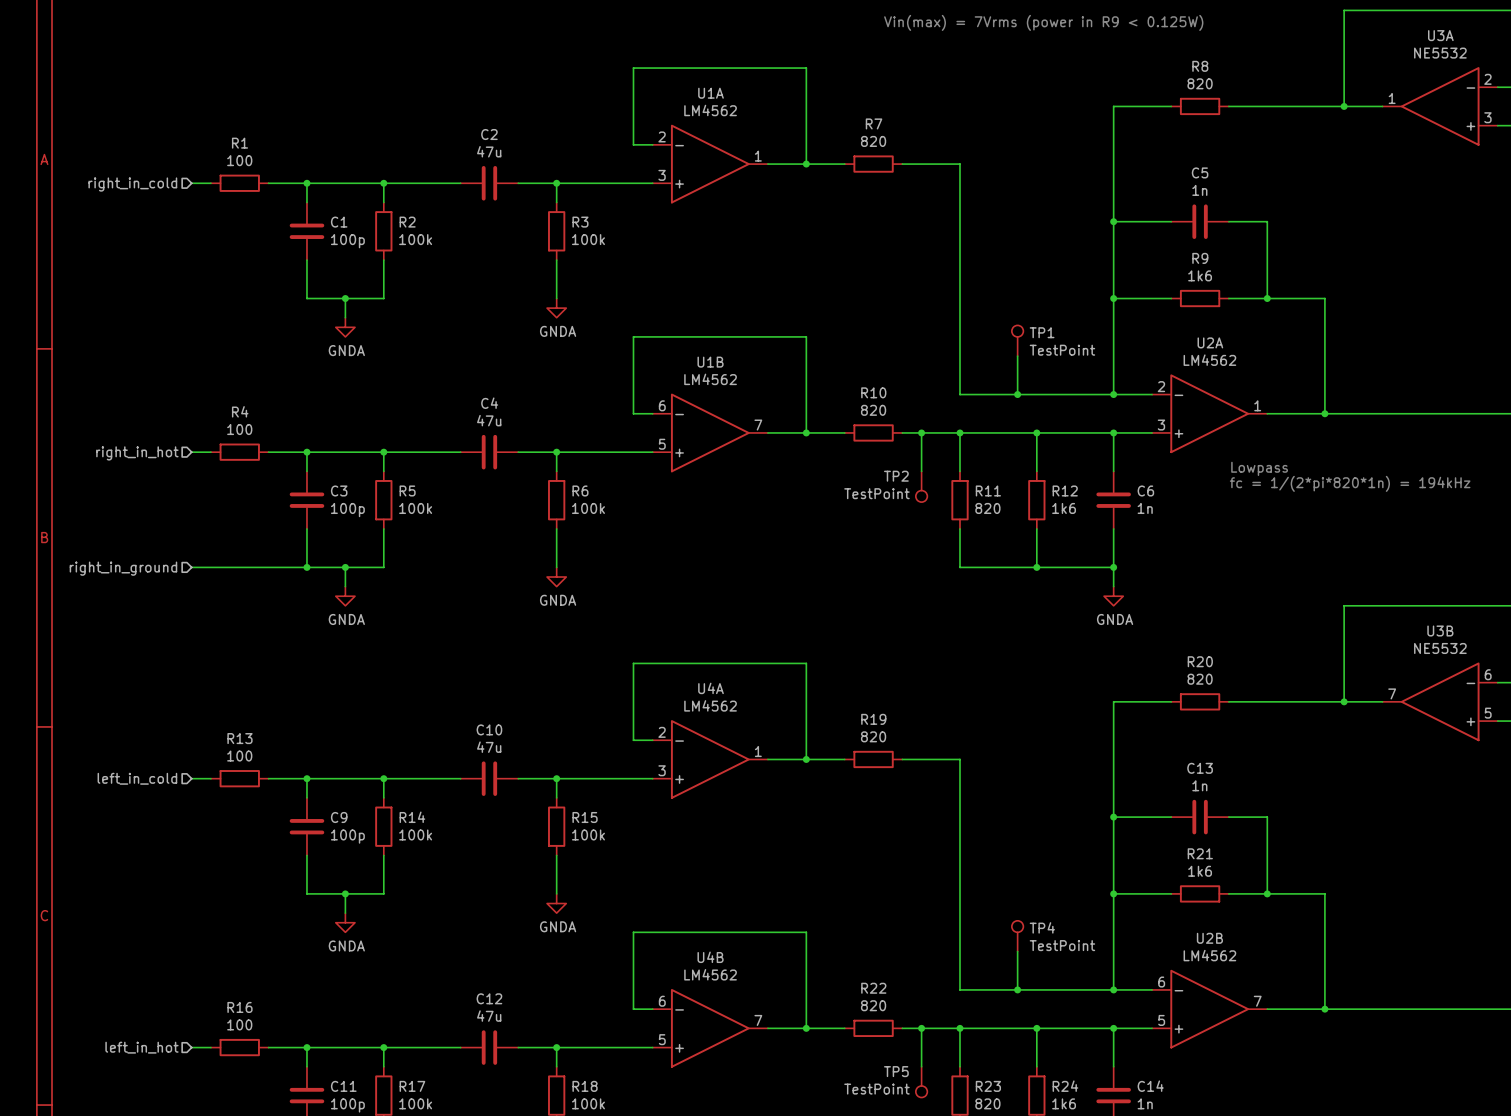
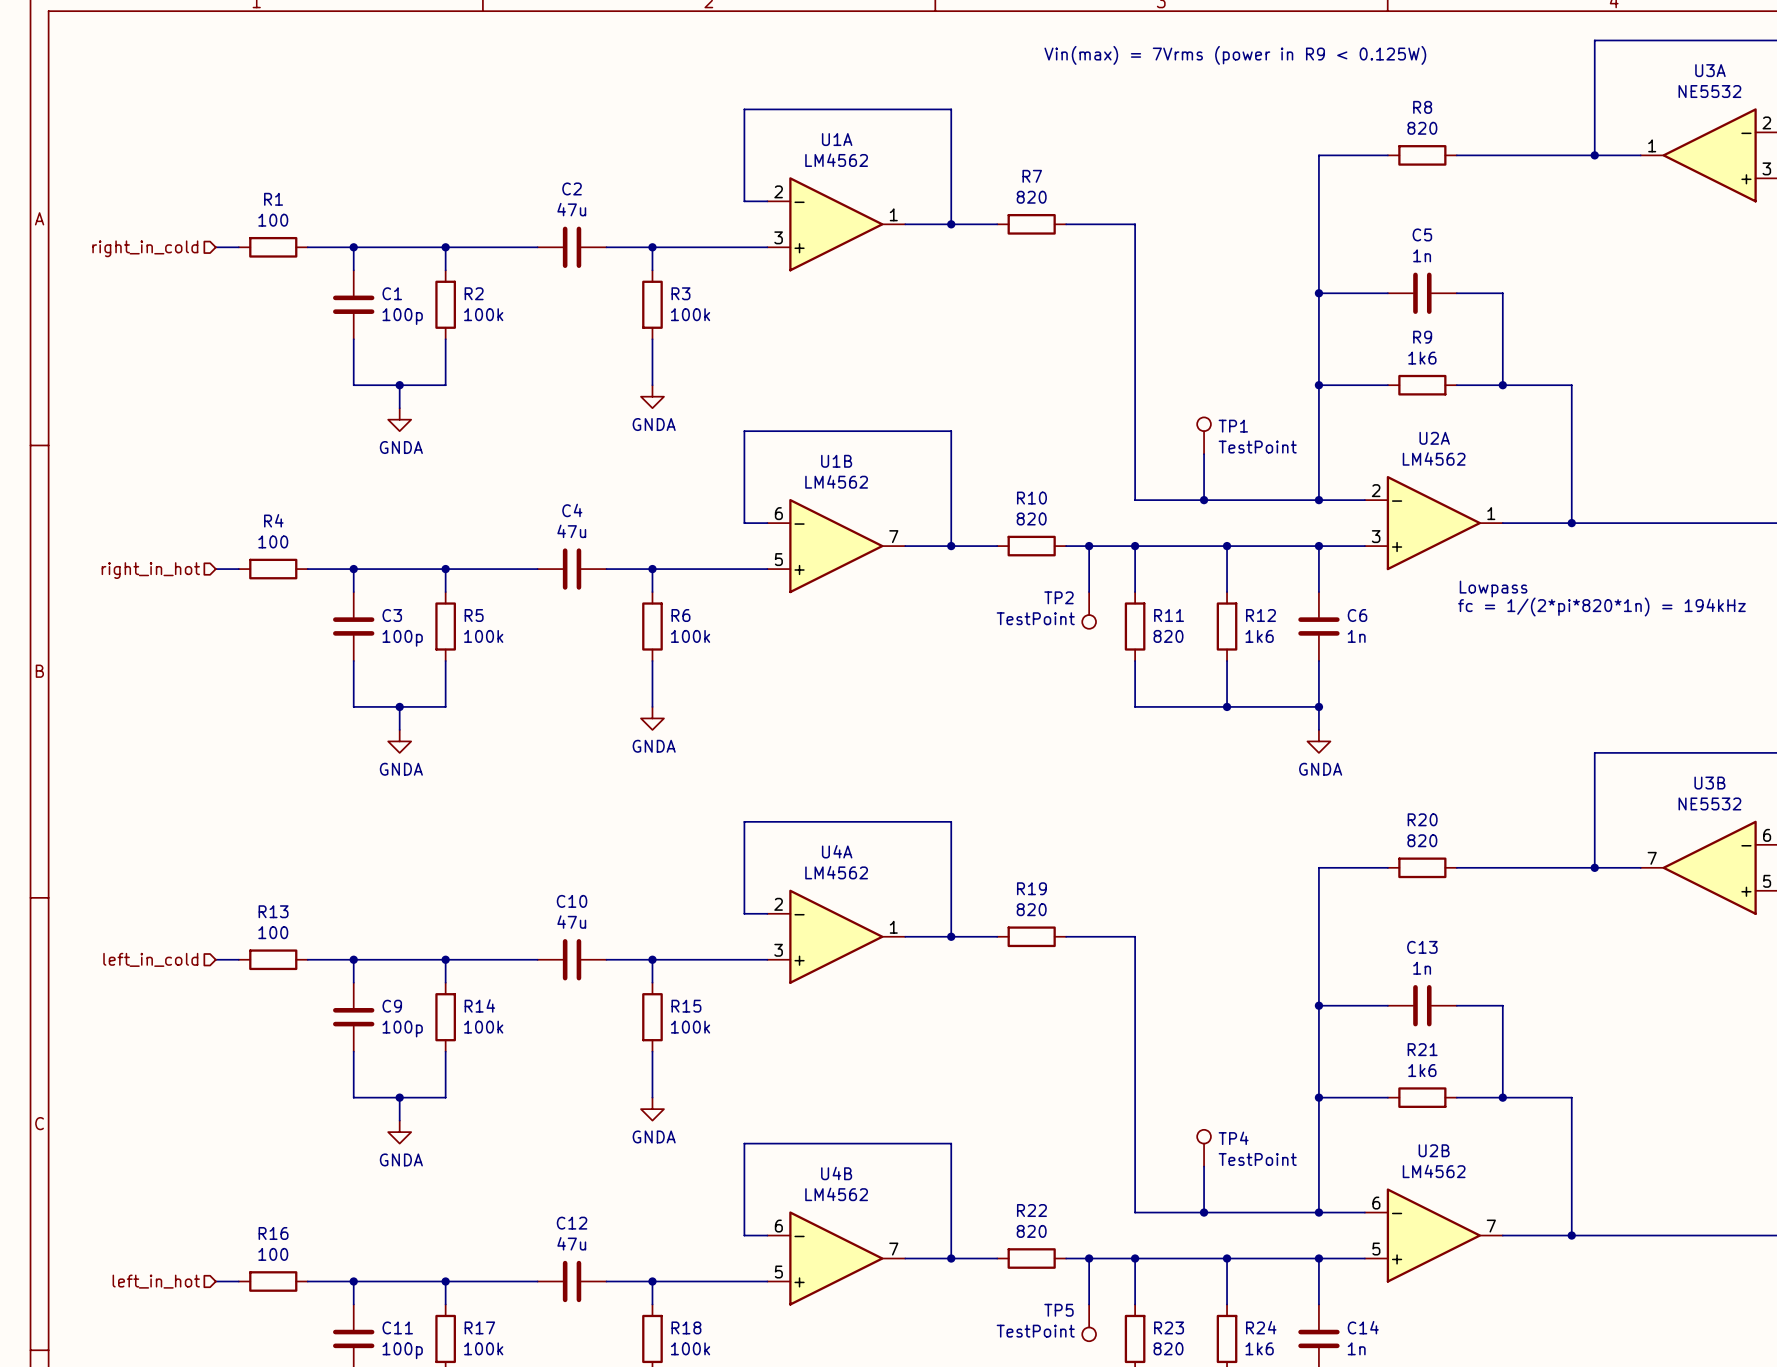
wire: (191, 567) (306, 567) -> none
junction: (306, 567) -> none
hierarchical label: right_in_ground (123, 568) -> none

